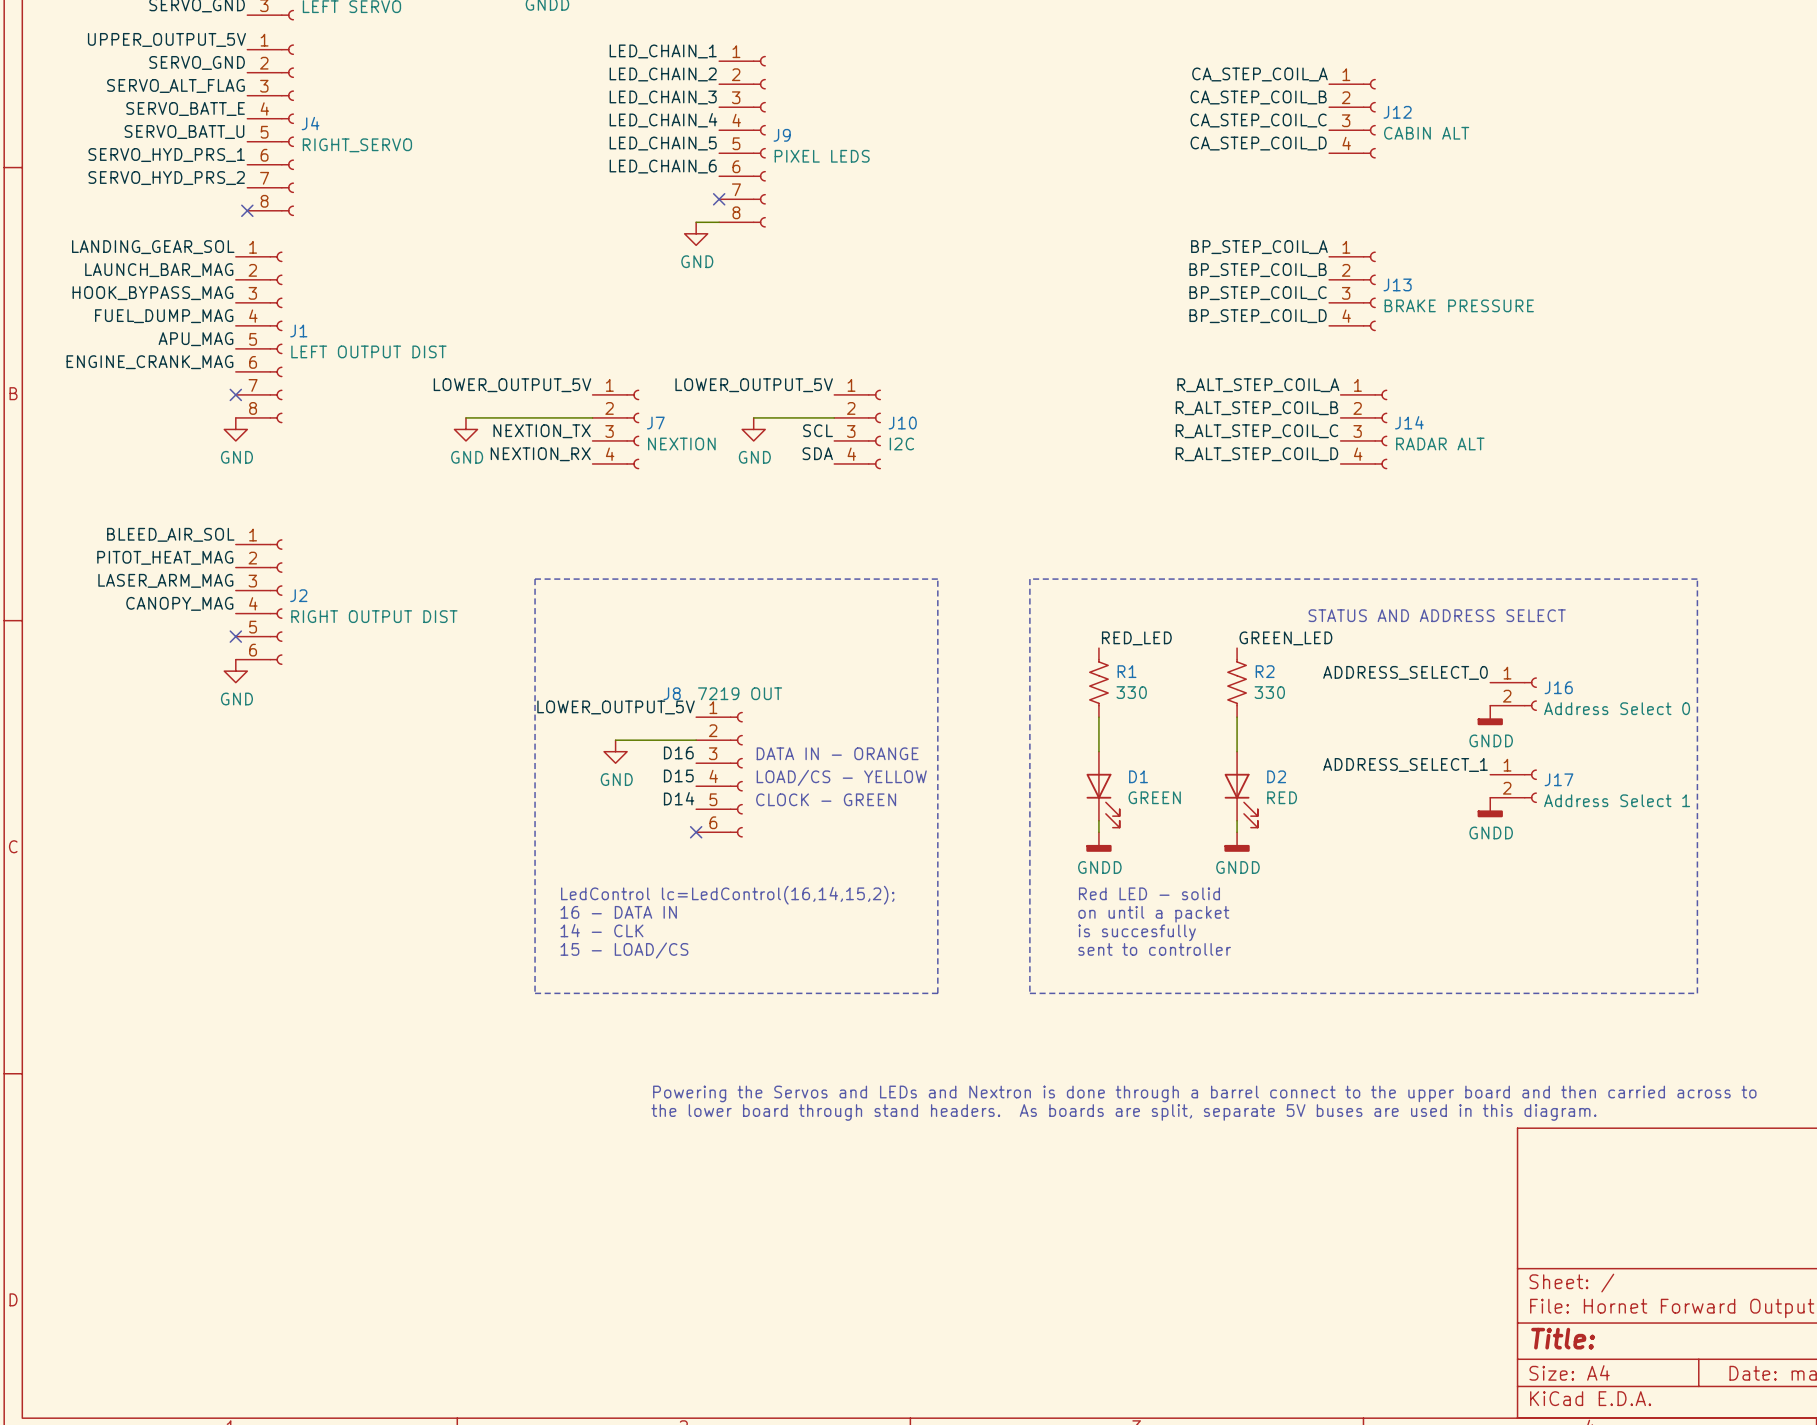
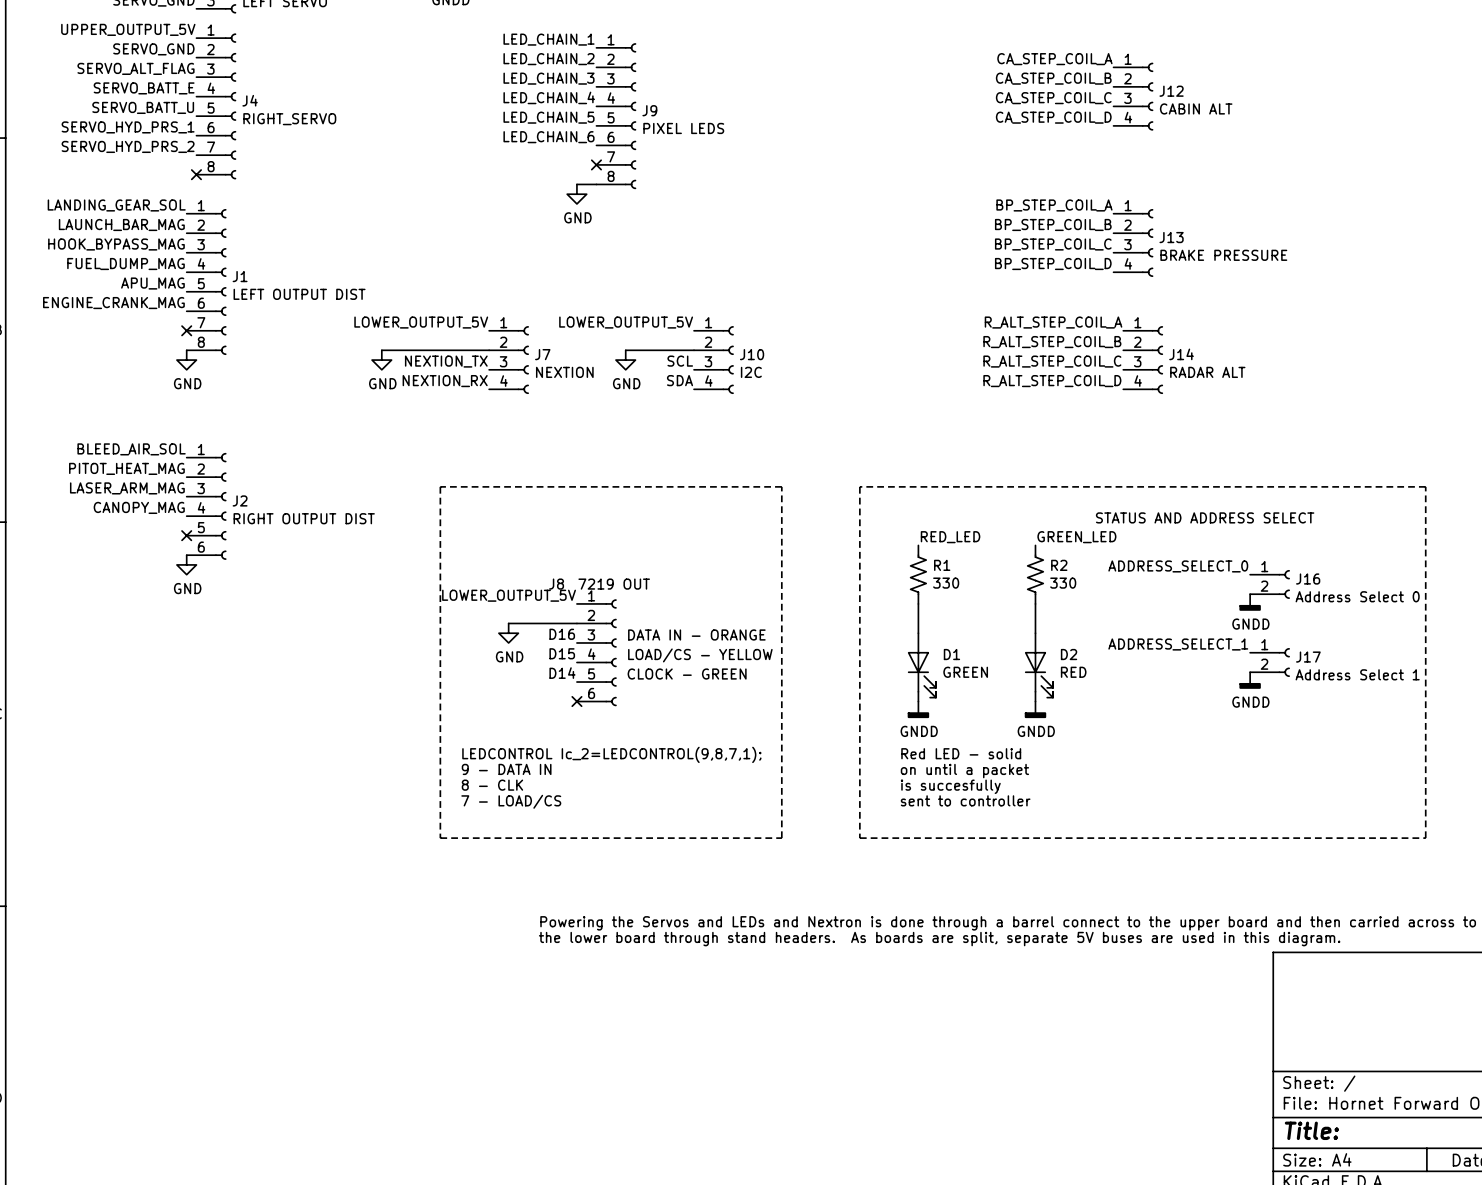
text: LedControl lc=LedControl(16,14,15,2); (727, 895) -> LEDCONTROL Ic_2=LEDCONTROL(9,8,7,1); (611, 754)
text: 16 - DATA IN (618, 912) -> 9 - DATA IN (506, 769)
text: 14 - CLK (601, 930) -> 8 - CLK (492, 785)
text: 15 - LOAD/CS (624, 950) -> 7 - LOAD/CS (511, 801)

